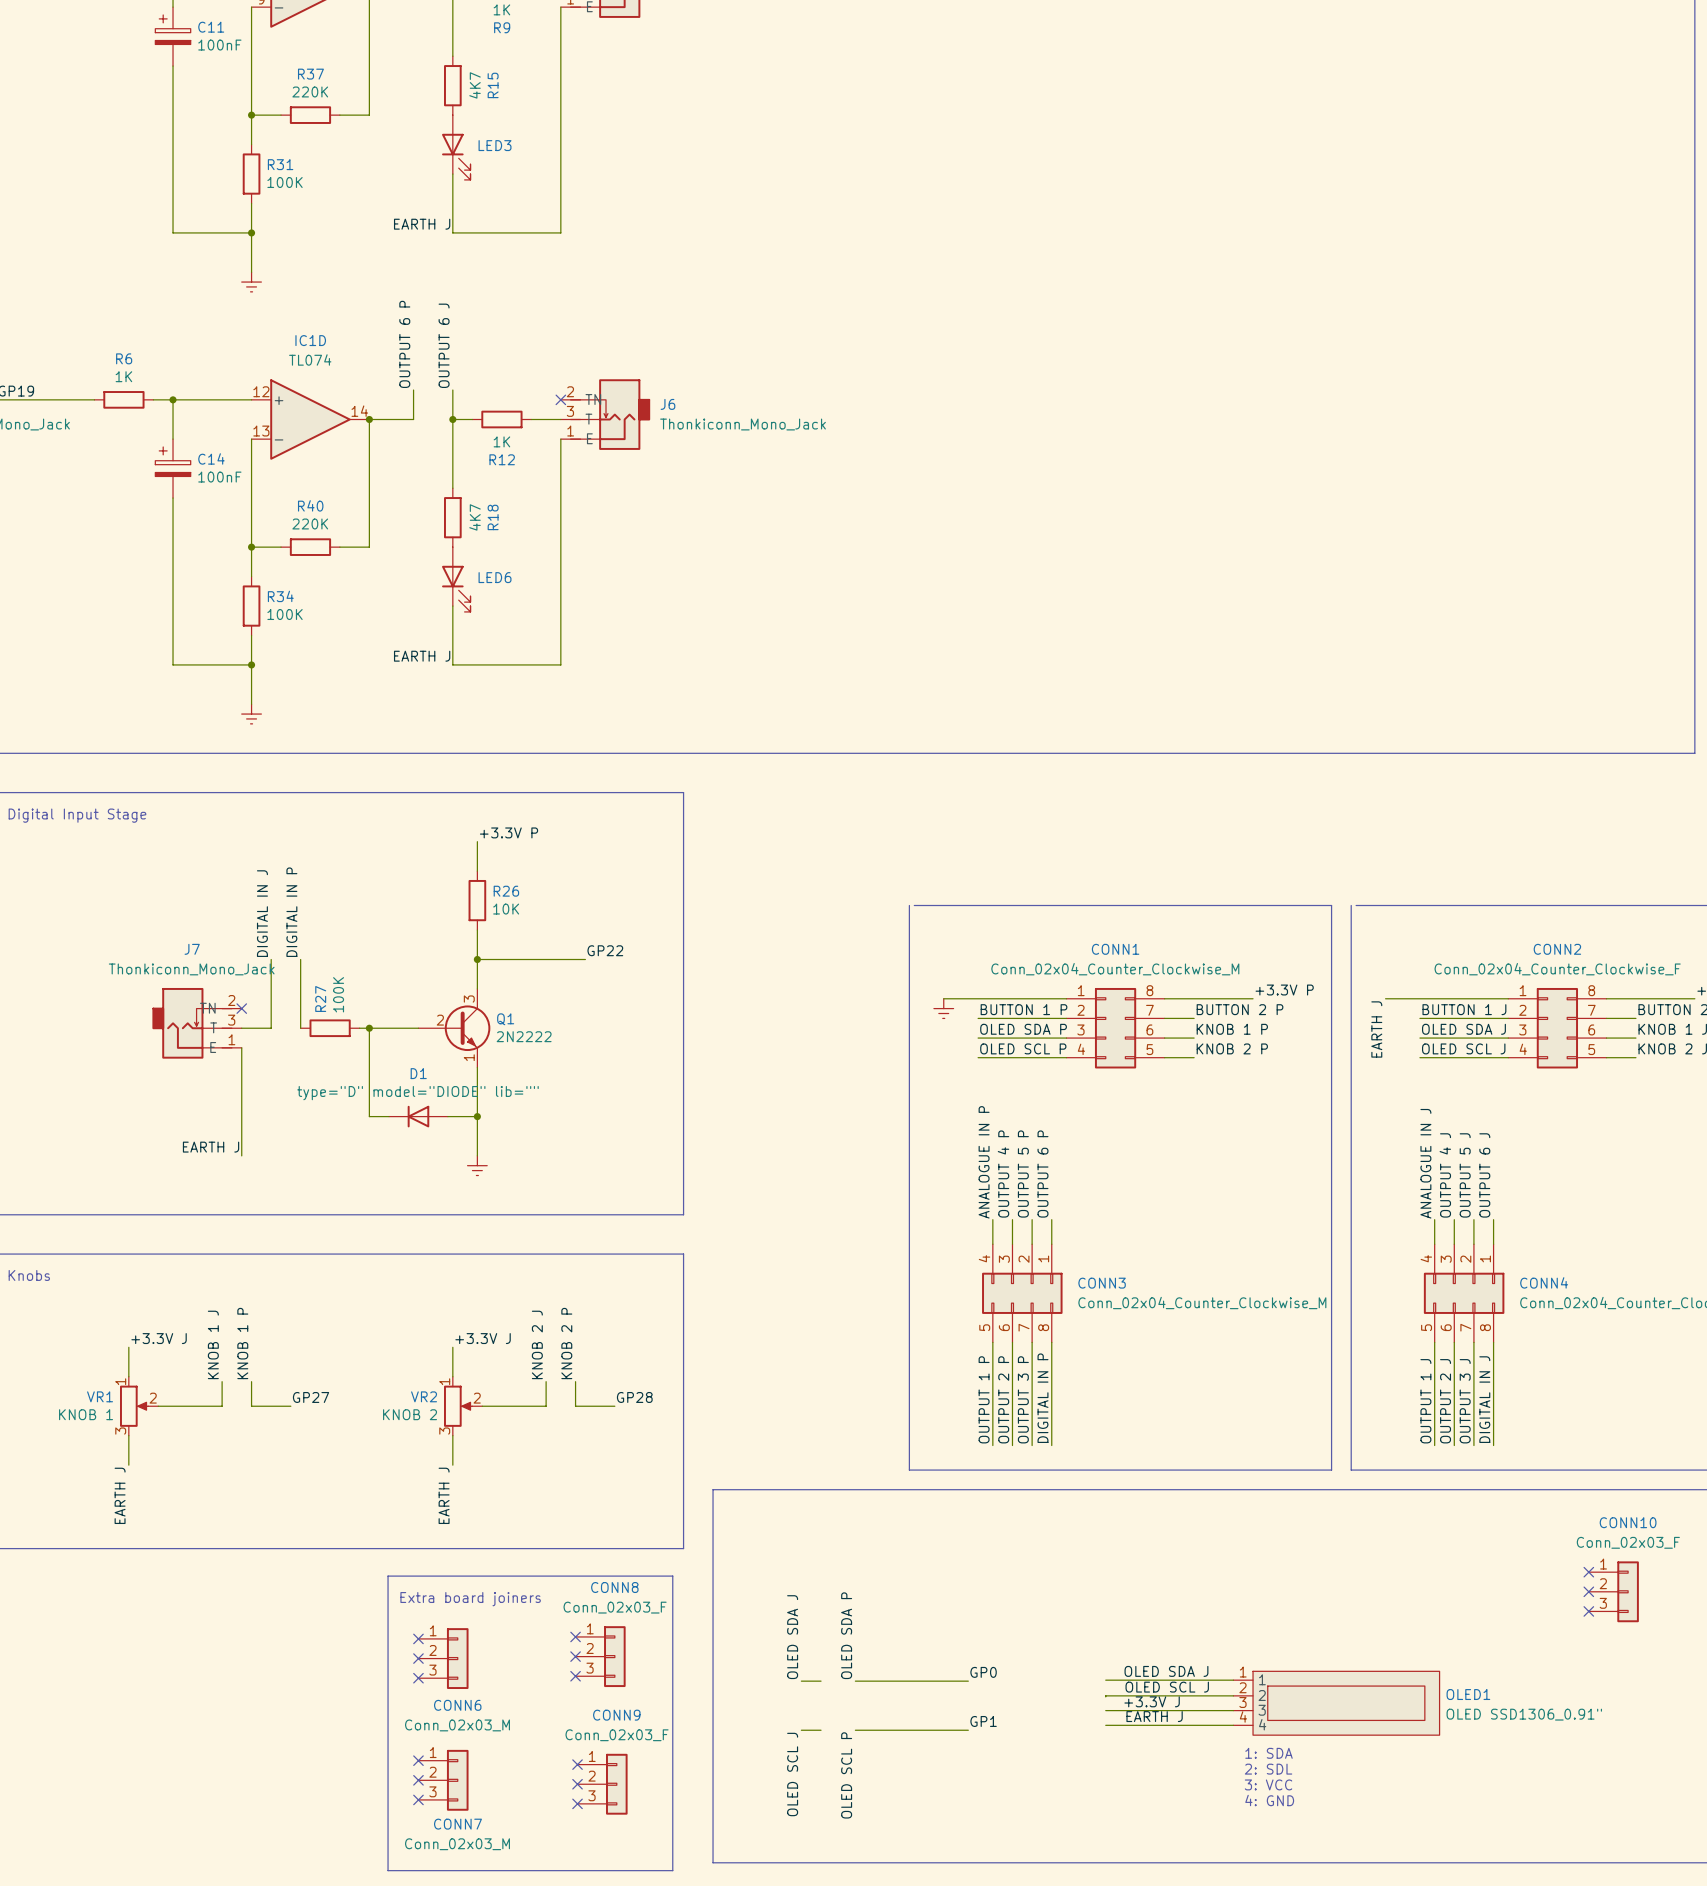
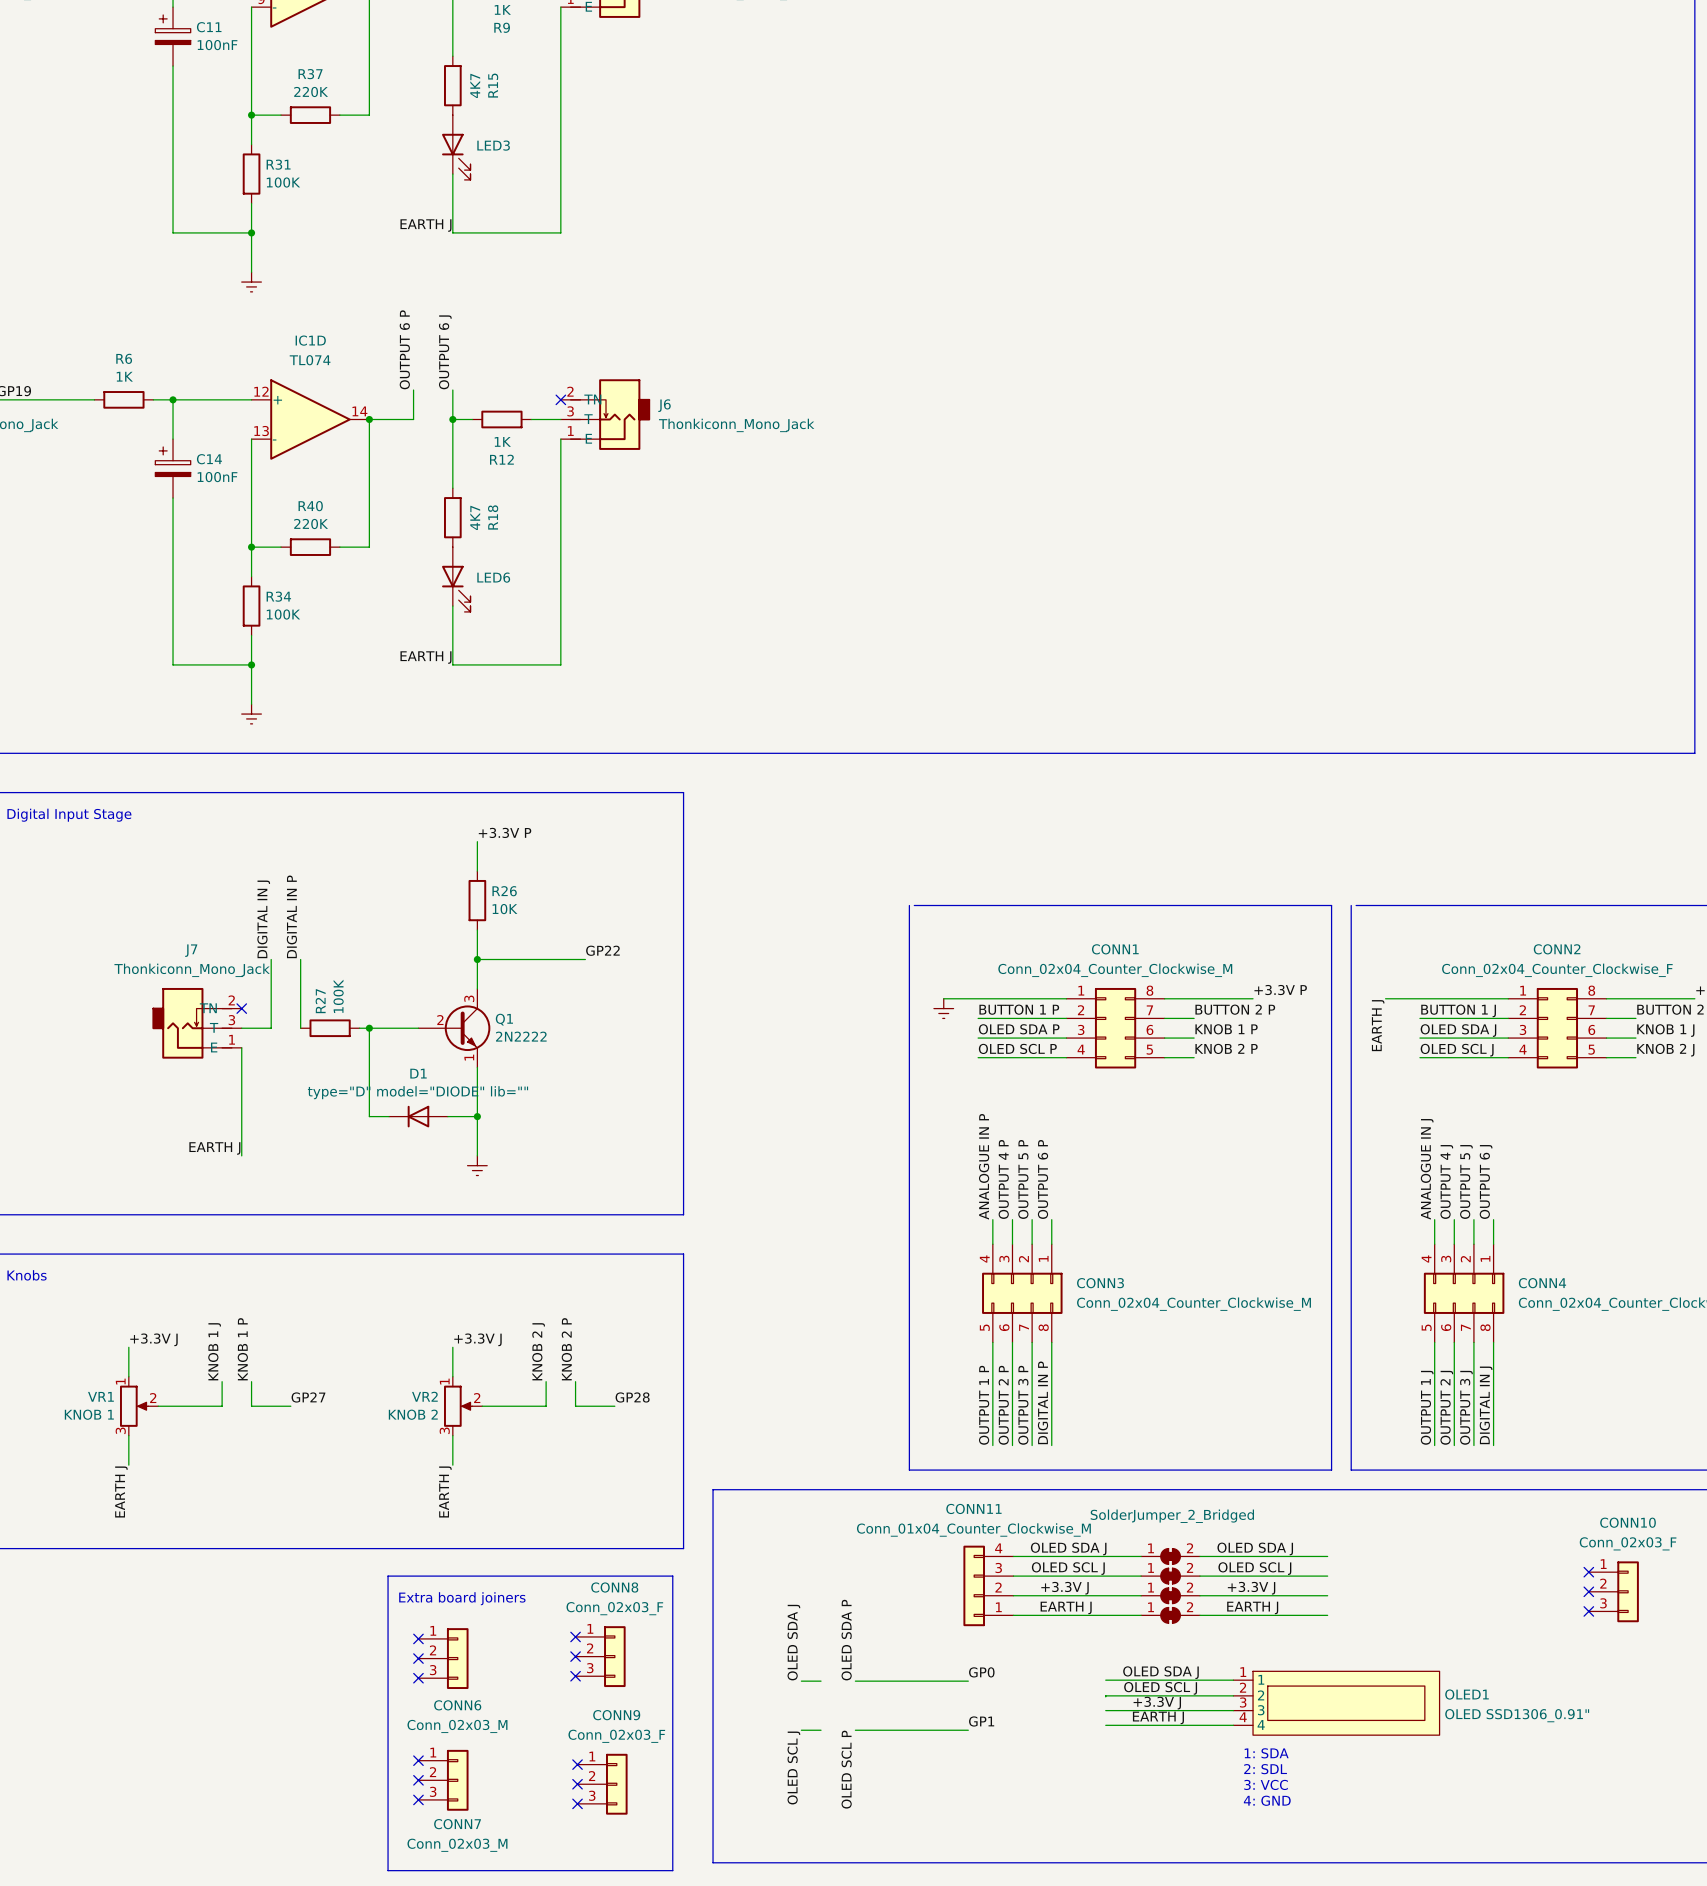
label: none -> OLED SDA J (1068, 1548)
label: none -> OLED SDA J (1255, 1548)
wire: none -> (1013, 1556) (1141, 1556)
part: none -> SolderJumper_2_Bridged (1170, 1556)
wire: none -> (1200, 1556) (1327, 1556)
label: none -> OLED SCL J (1068, 1568)
label: none -> OLED SCL J (1254, 1568)
wire: none -> (1013, 1576) (1141, 1576)
part: none -> (1170, 1576)
wire: none -> (1200, 1576) (1327, 1576)
CONN11: none -> Conn_01x04_Counter_Clockwise_M (988, 1585)
label: none -> +3.3V J (1065, 1588)
label: none -> +3.3V J (1251, 1588)
wire: none -> (1013, 1595) (1141, 1595)
part: none -> (1170, 1595)
wire: none -> (1200, 1595) (1327, 1595)
label: none -> EARTH J (1066, 1607)
label: none -> EARTH J (1252, 1607)
wire: none -> (1013, 1615) (1141, 1615)
part: none -> (1170, 1615)
wire: none -> (1200, 1615) (1327, 1615)

